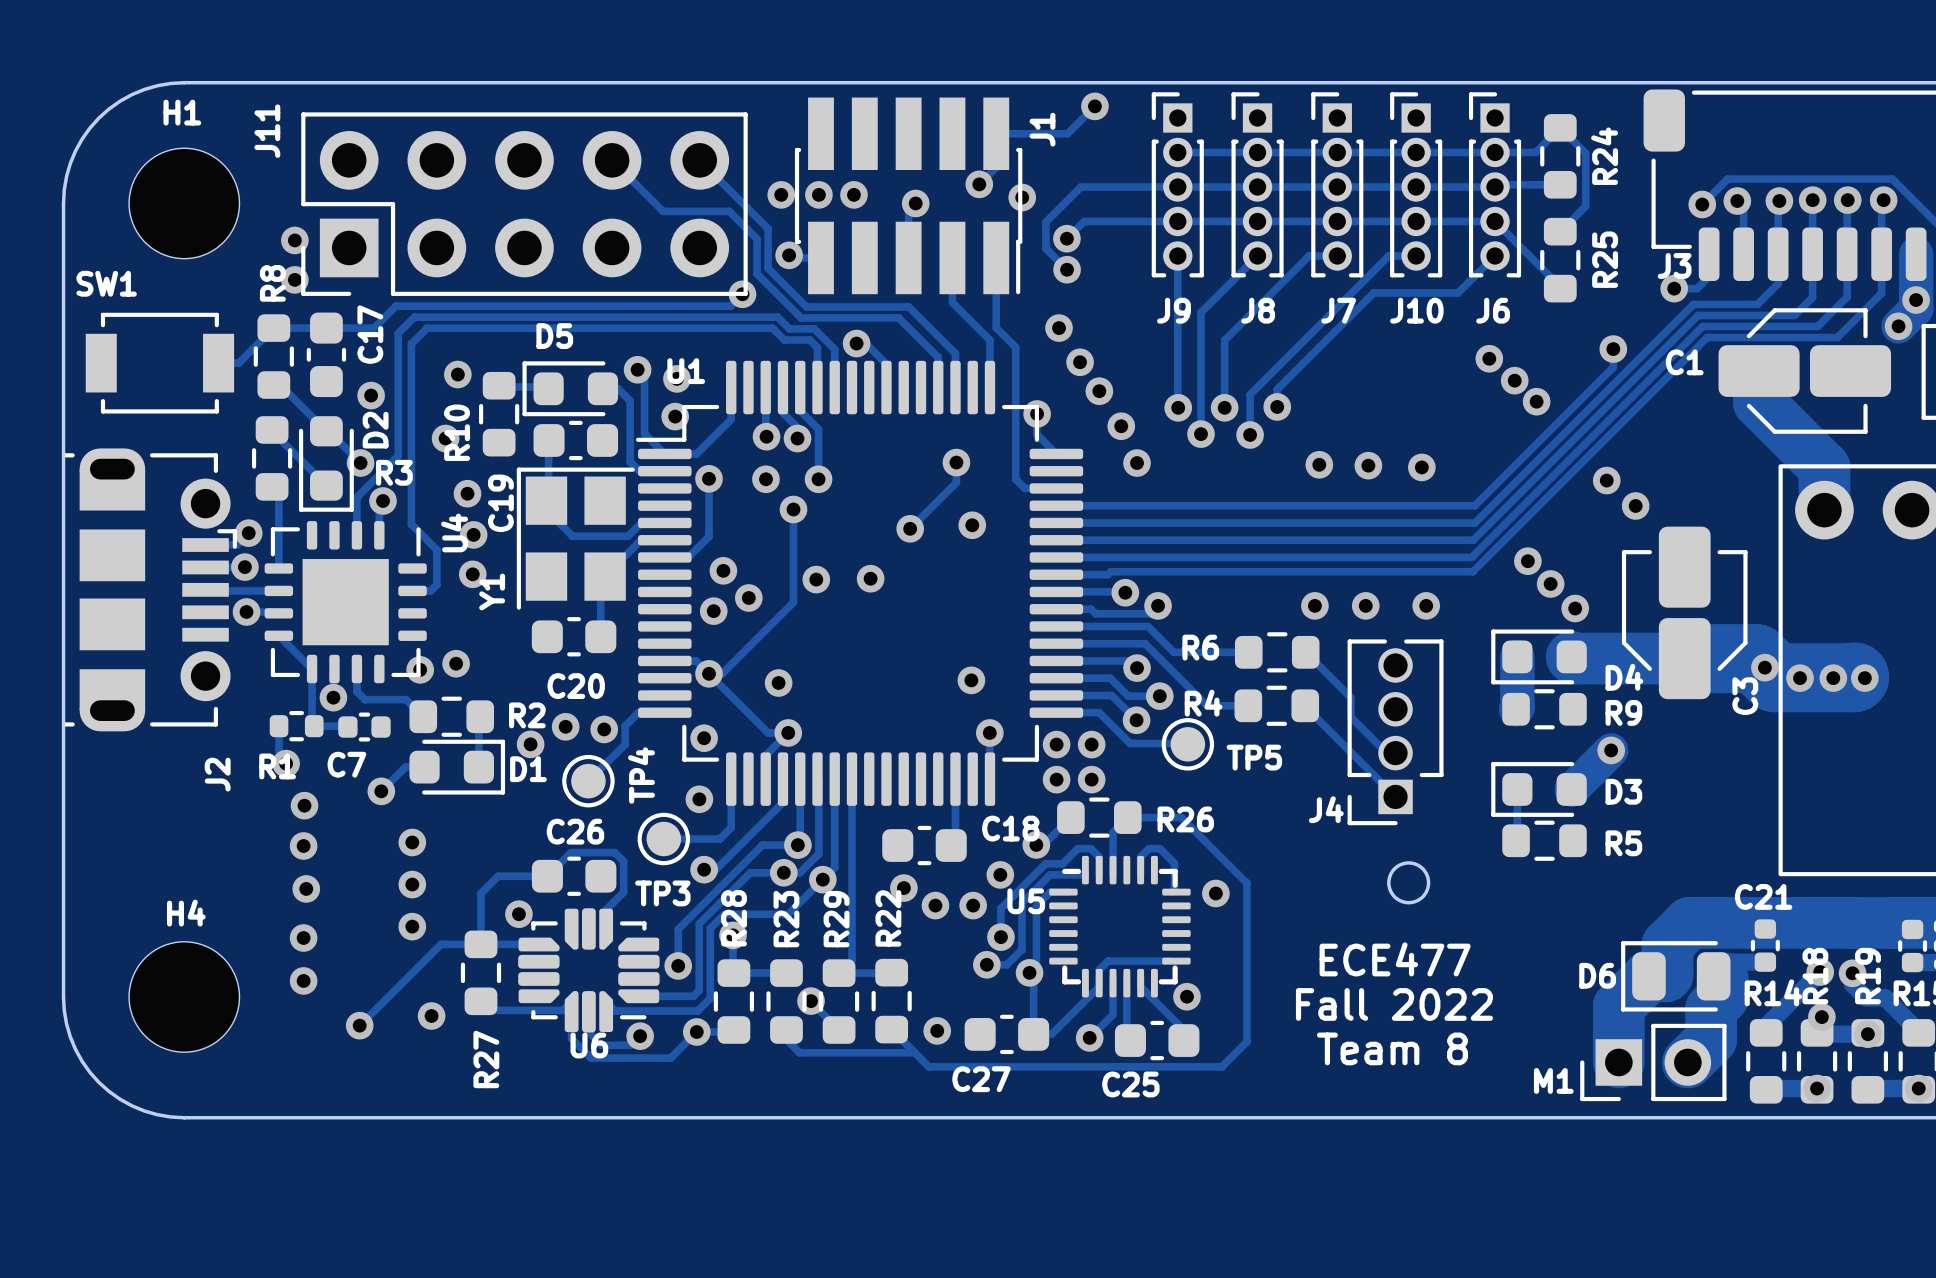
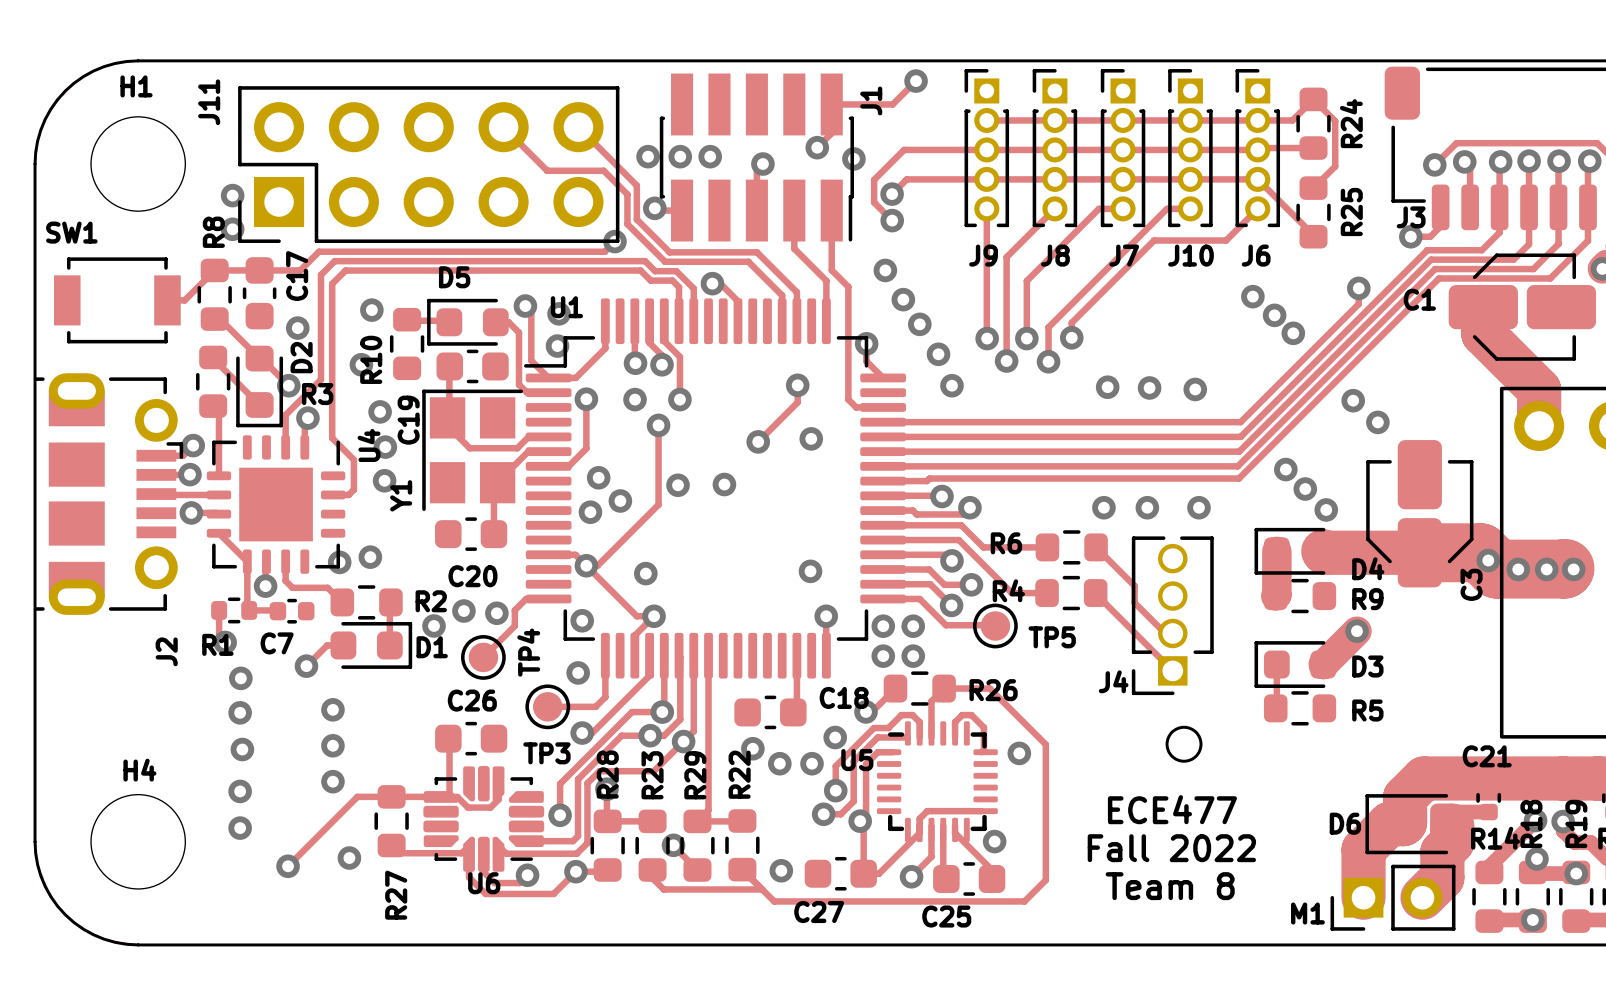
via: (518, 914) -> none
track: (606, 938) (606, 909) (623, 892) (623, 861) (614, 852) (571, 852) (547, 876) (498, 876) (480, 893) (480, 944) -> (498, 792) (498, 799) (490, 807) (467, 807) (457, 796) (449, 796) (448, 738)

